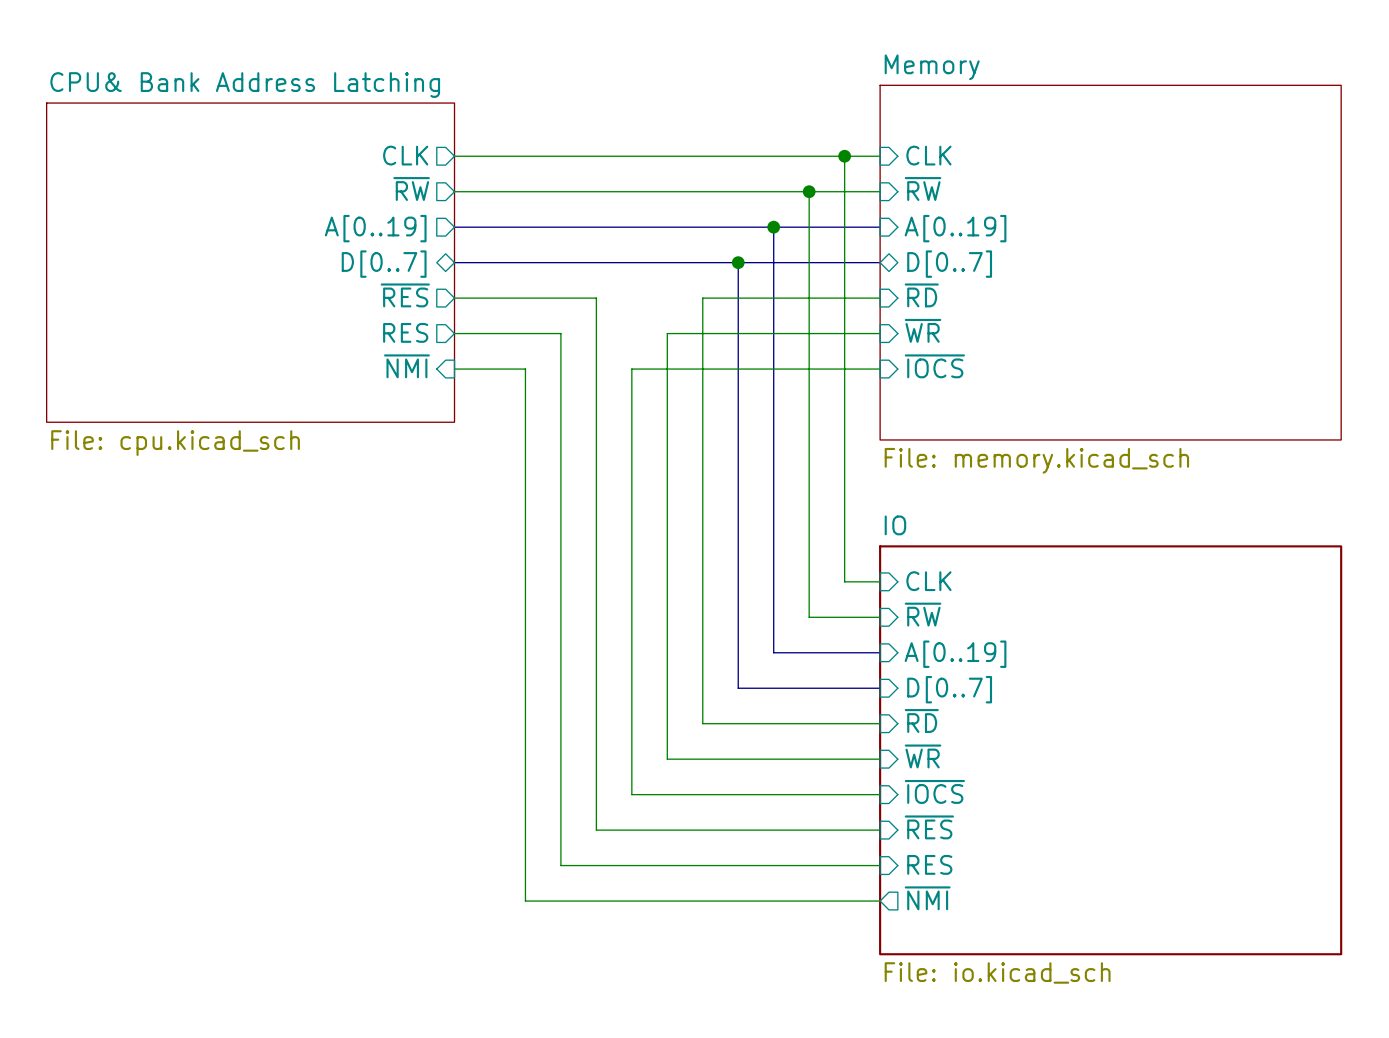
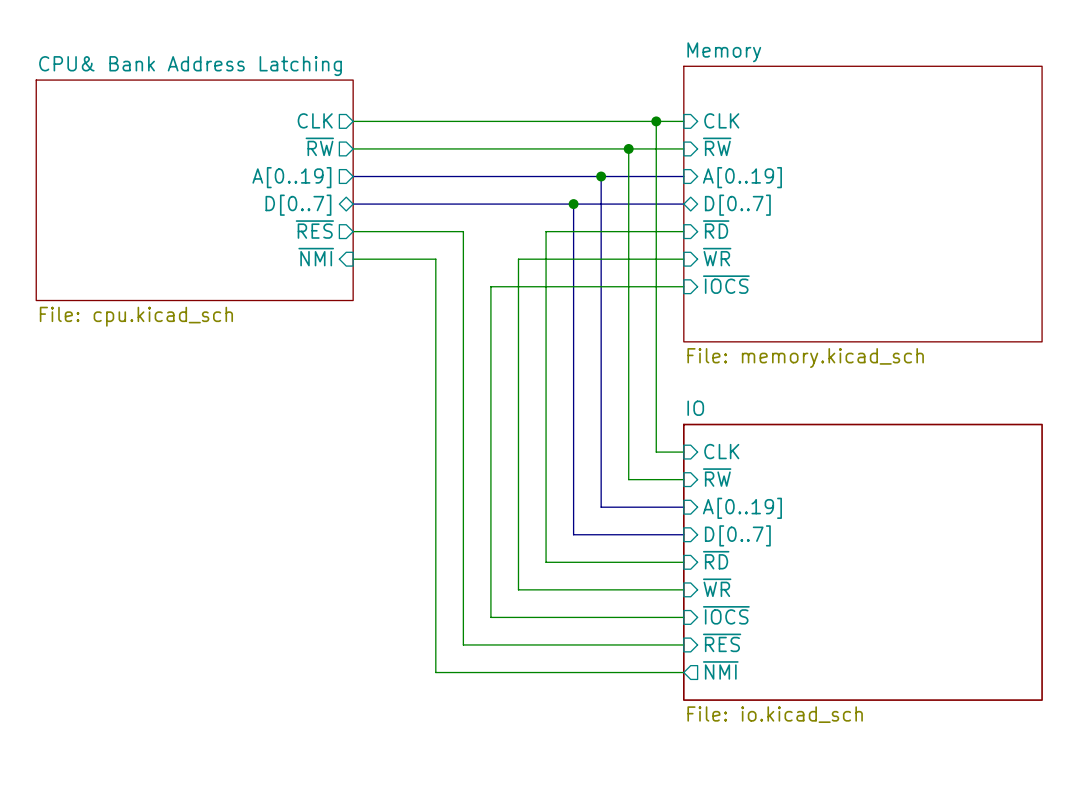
sheet CPU& Bank Address Latching: none -> File: cpu.kicad_sch (194, 190)
sheet CPU& Bank Address Latching: File: cpu.kicad_sch (250, 262) -> none
sheet pin shape: output (405, 332) -> input (316, 257)
sheet pin: RES (405, 332) -> ~{NMI} (316, 257)
sheet pin: ~{NMI} (406, 366) -> none
wire: (454, 369) (525, 369) (525, 901) (880, 901) -> none
sheet IO: none -> File: io.kicad_sch (862, 562)
sheet IO: File: io.kicad_sch (1110, 750) -> none
sheet pin shape: input (929, 864) -> output (720, 670)
sheet pin: RES (929, 864) -> ~{NMI} (720, 670)
sheet pin: ~{NMI} (927, 898) -> none

